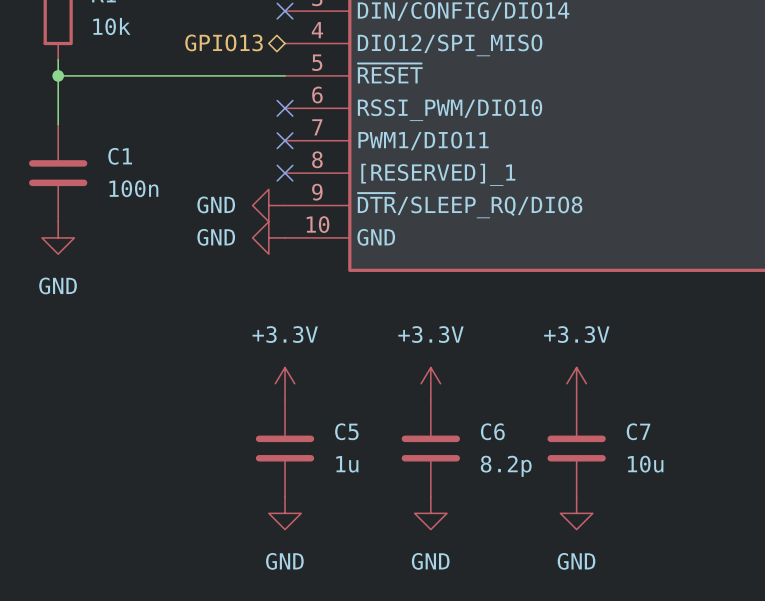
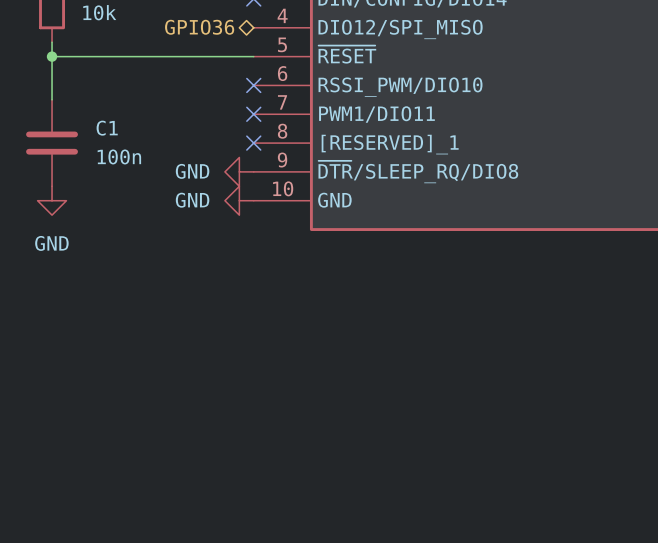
hierarchical label: GPIO13 (224, 42) -> GPIO36 (199, 27)
power symbol: +3.3V (285, 383) -> none
power symbol: +3.3V (430, 383) -> none
power symbol: +3.3V (576, 383) -> none
C5: 1u (285, 448) -> none
C6: 8.2p (430, 448) -> none
C7: 10u (576, 448) -> none
power symbol: GND (285, 513) -> none
power symbol: GND (430, 513) -> none
power symbol: GND (576, 513) -> none

